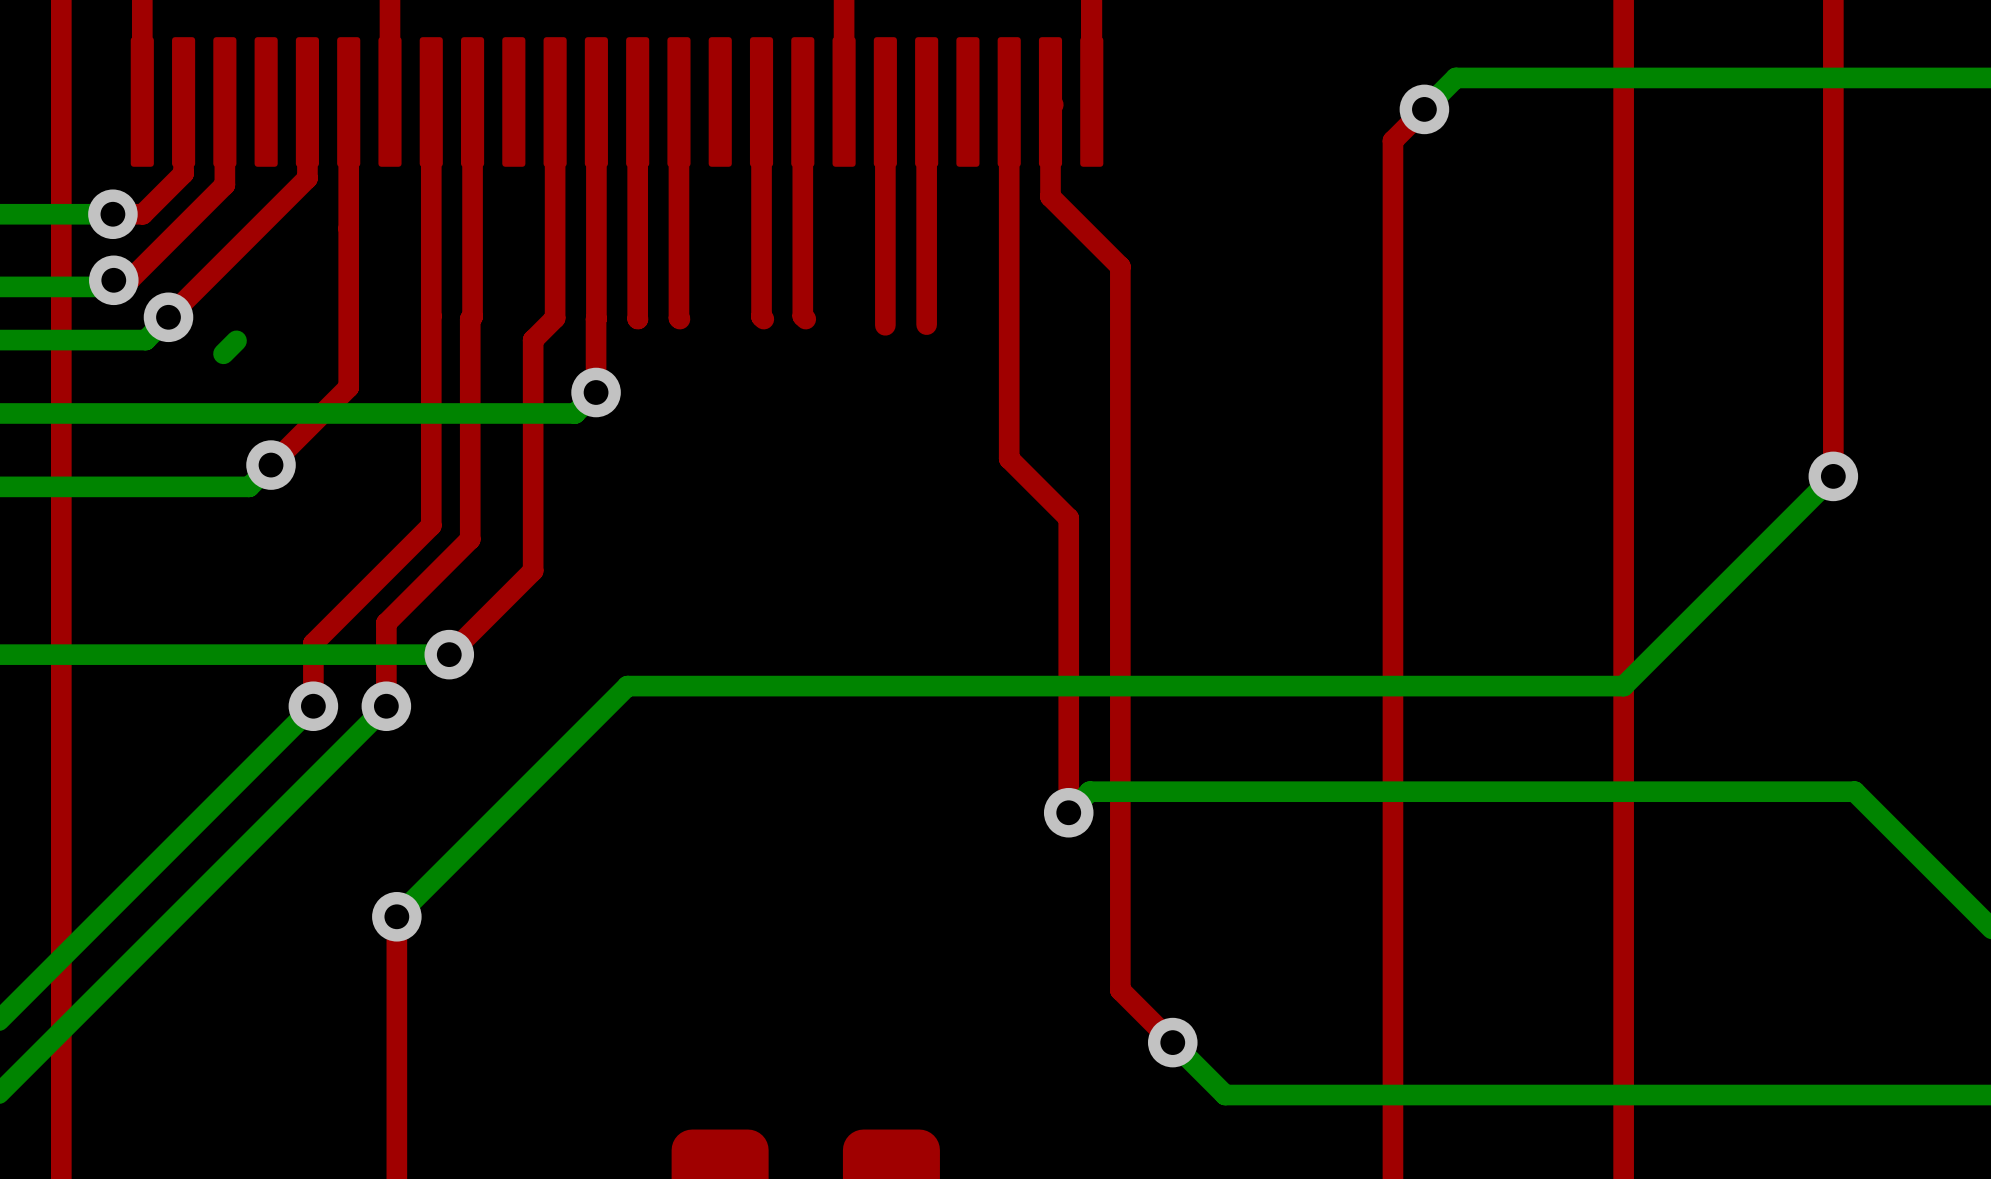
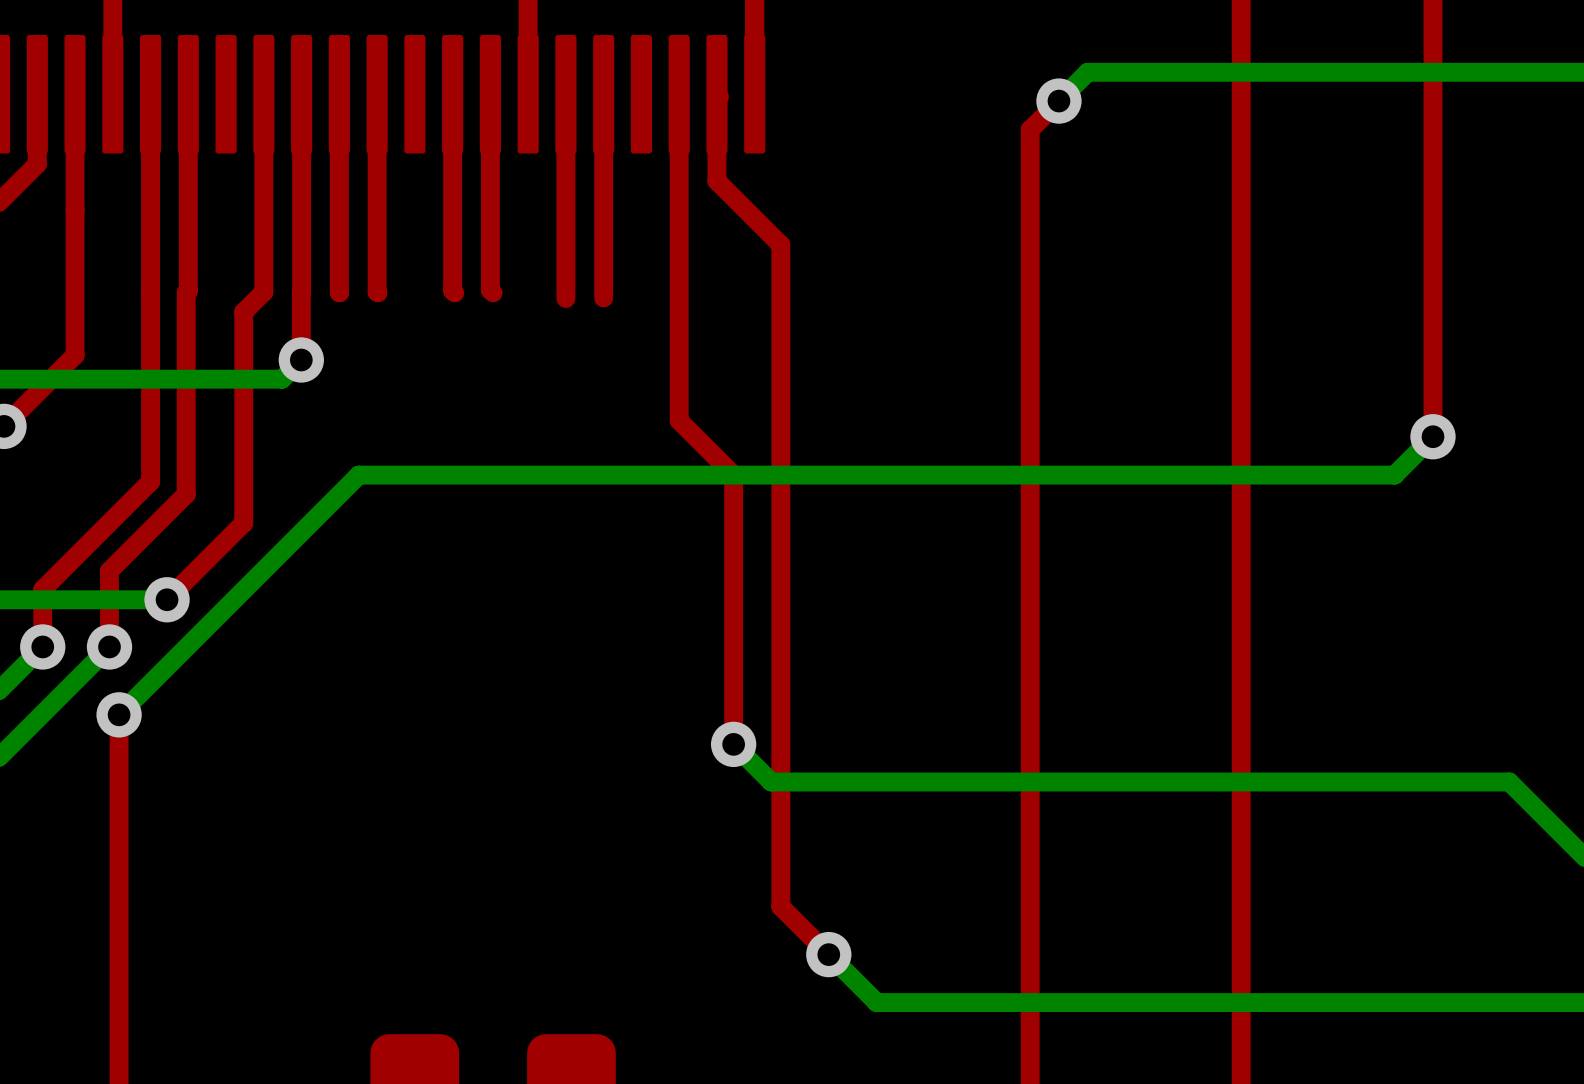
bottom track: (1791, 518) (1623, 686) (627, 686) (396, 916) -> (1394, 475) (358, 475) (119, 714)
top track: none -> (119, 714) (119, 839)
bottom track: (1068, 812) (1089, 791) (1854, 791) (1916, 853) -> (733, 744) (771, 781) (1509, 781)
via position: (396, 916) -> (119, 714)

